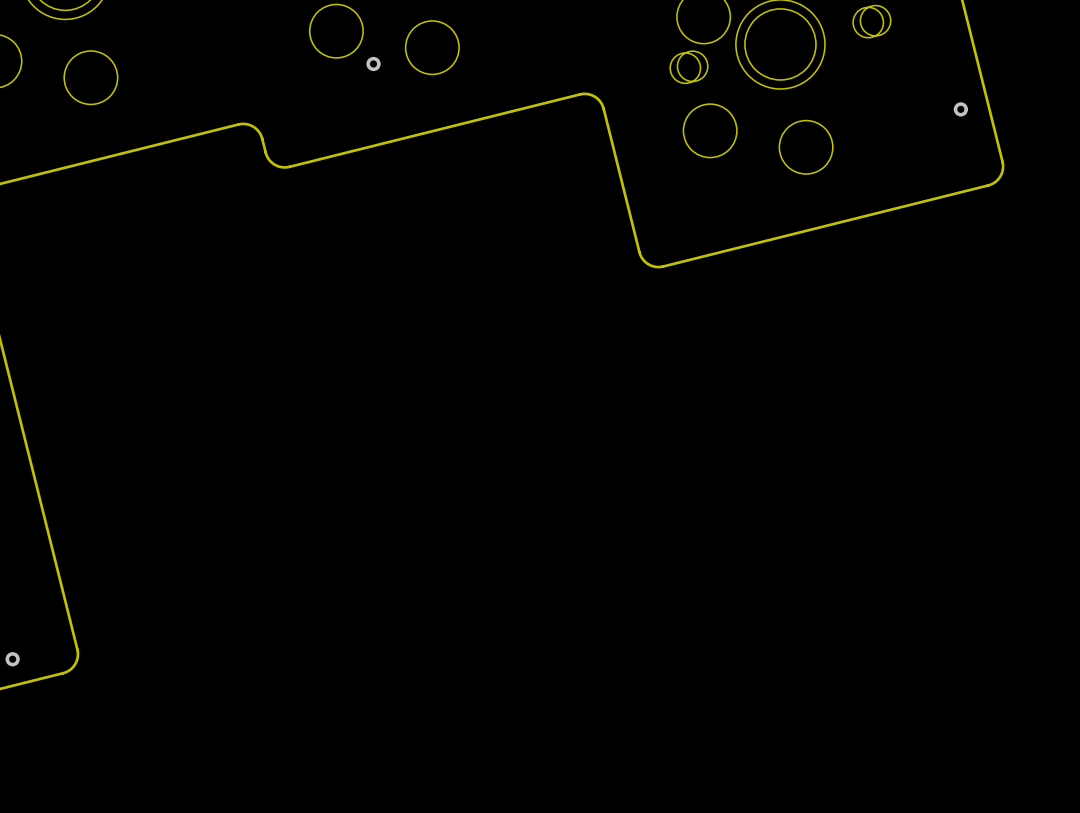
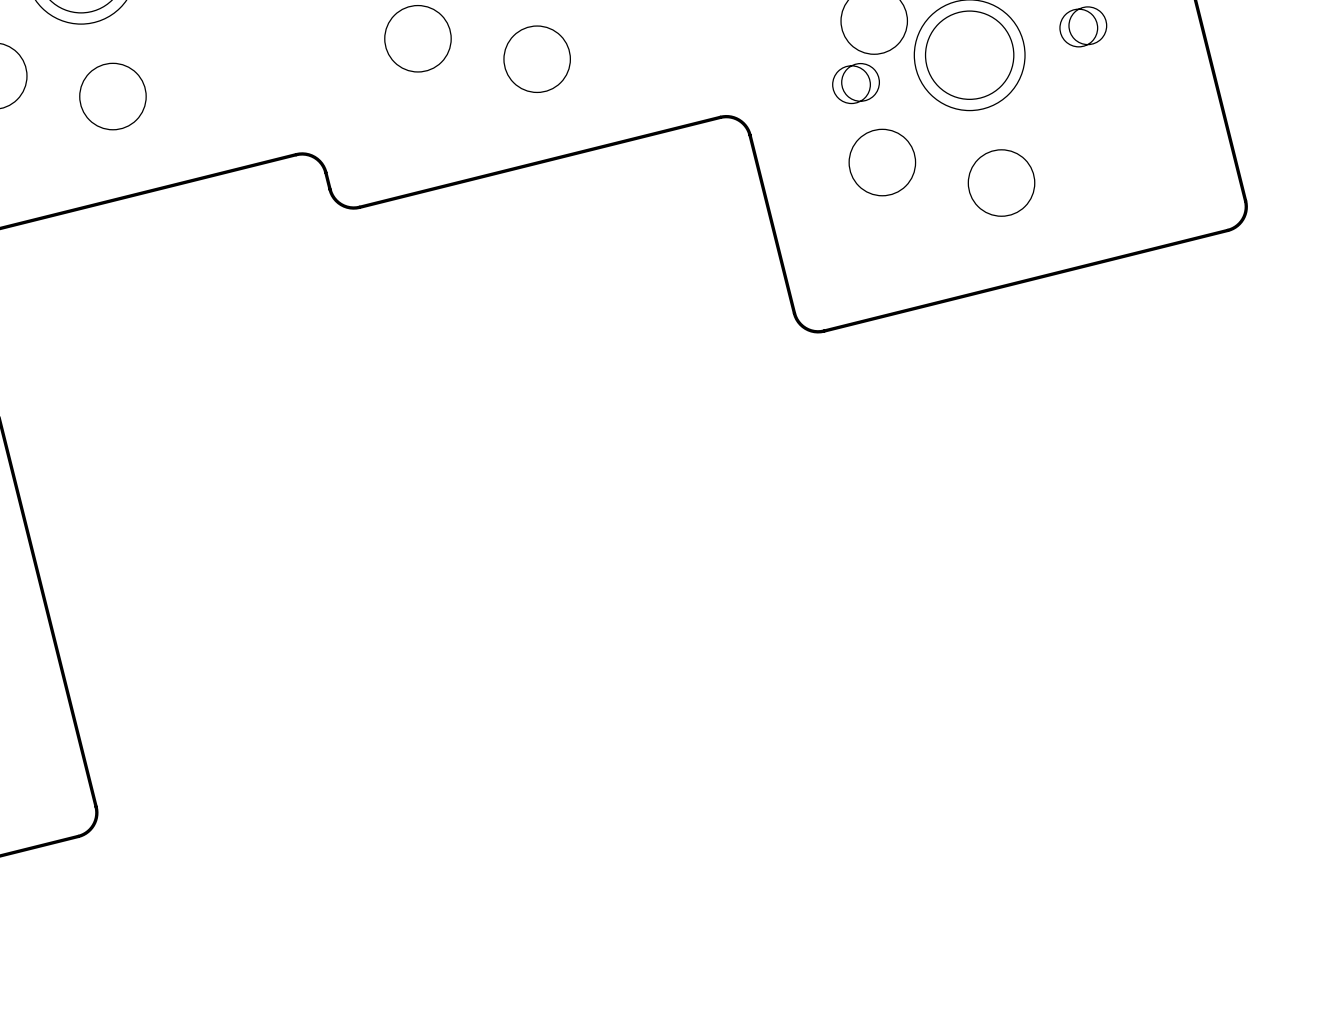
via: (373, 63) -> none
via: (960, 109) -> none
via: (12, 659) -> none

